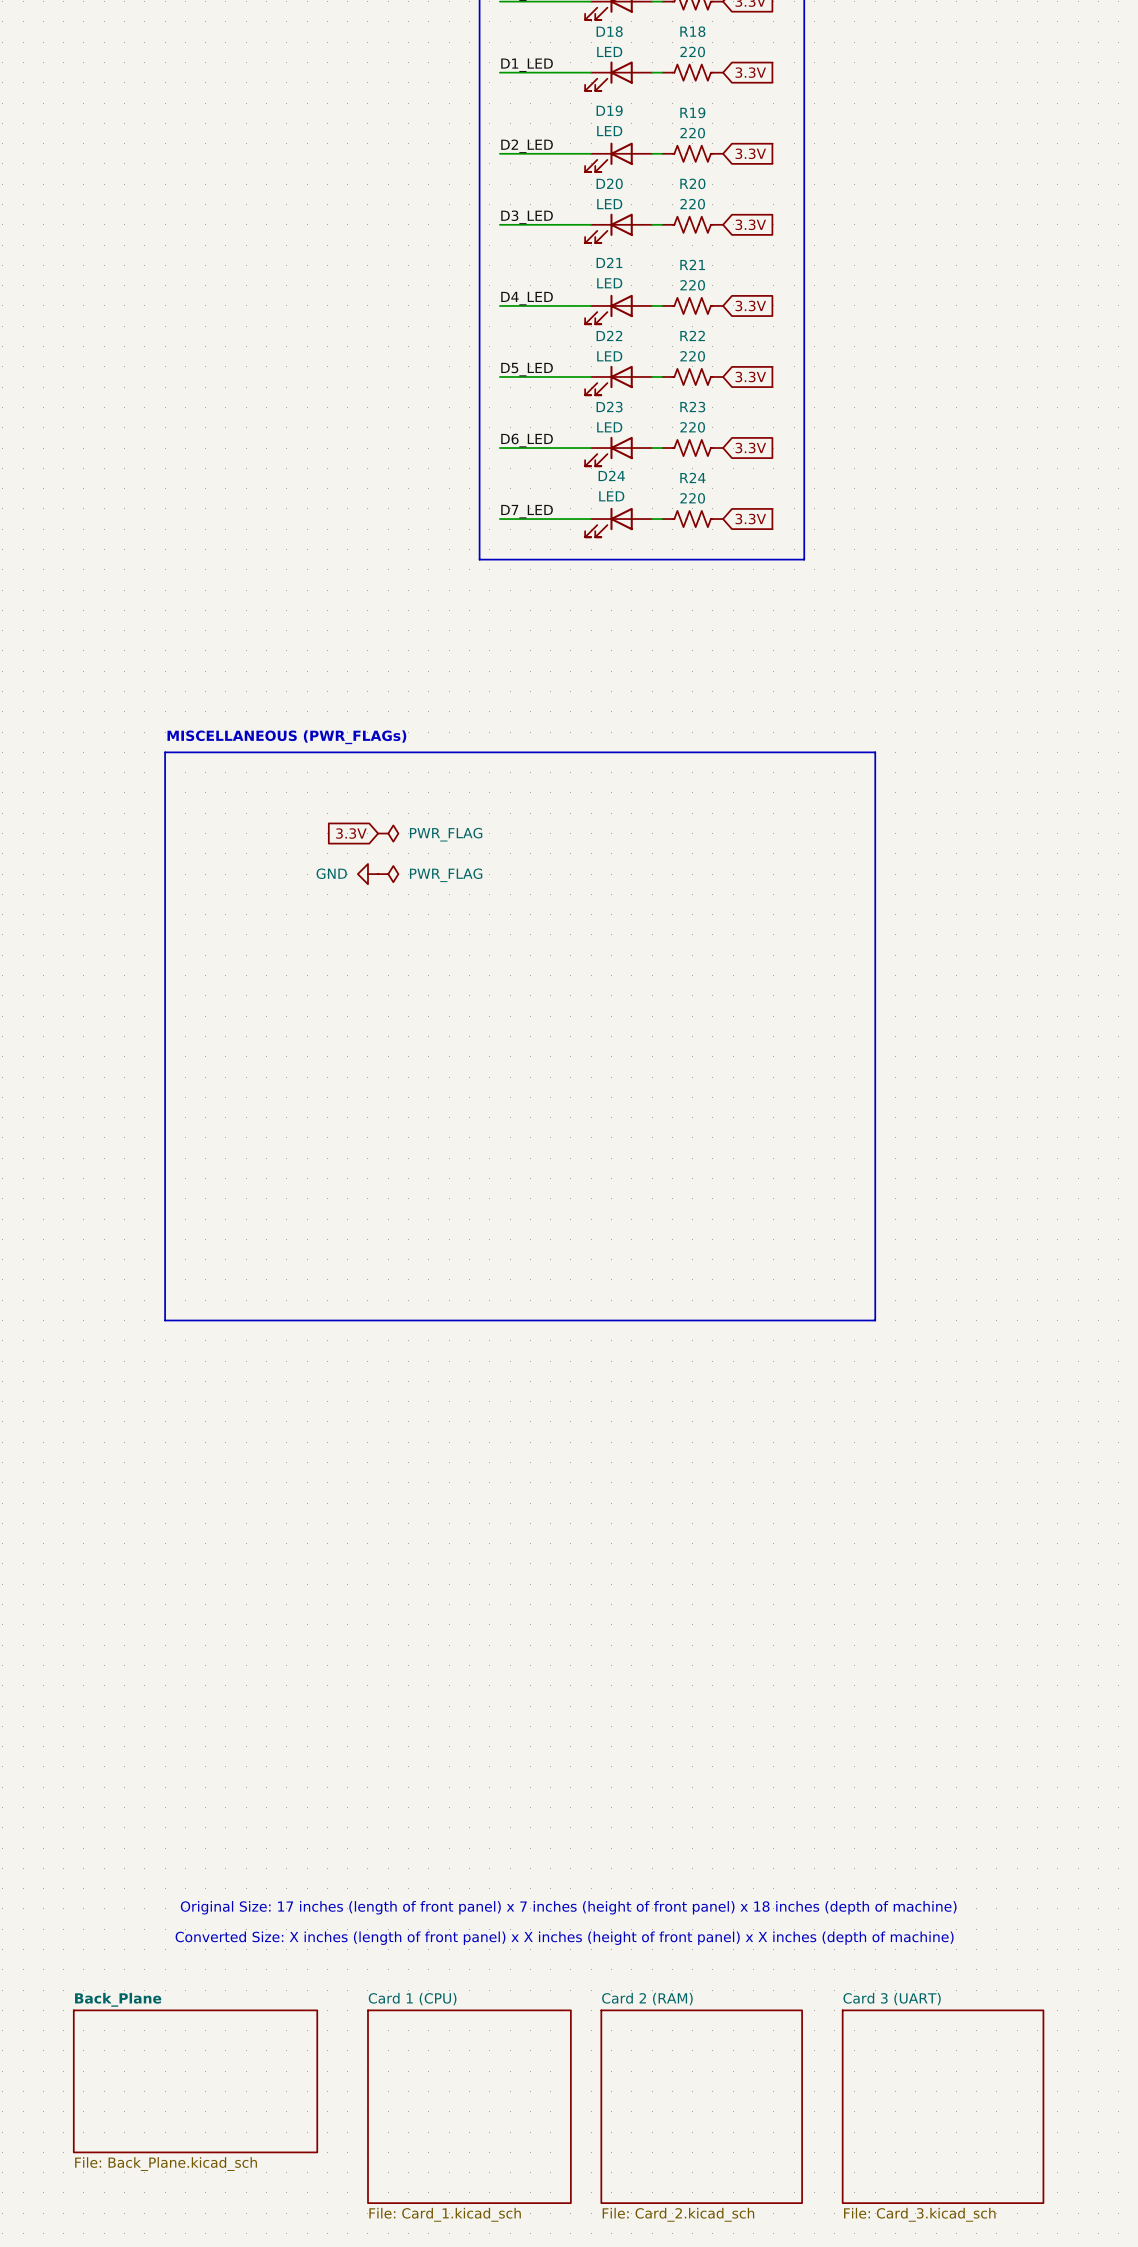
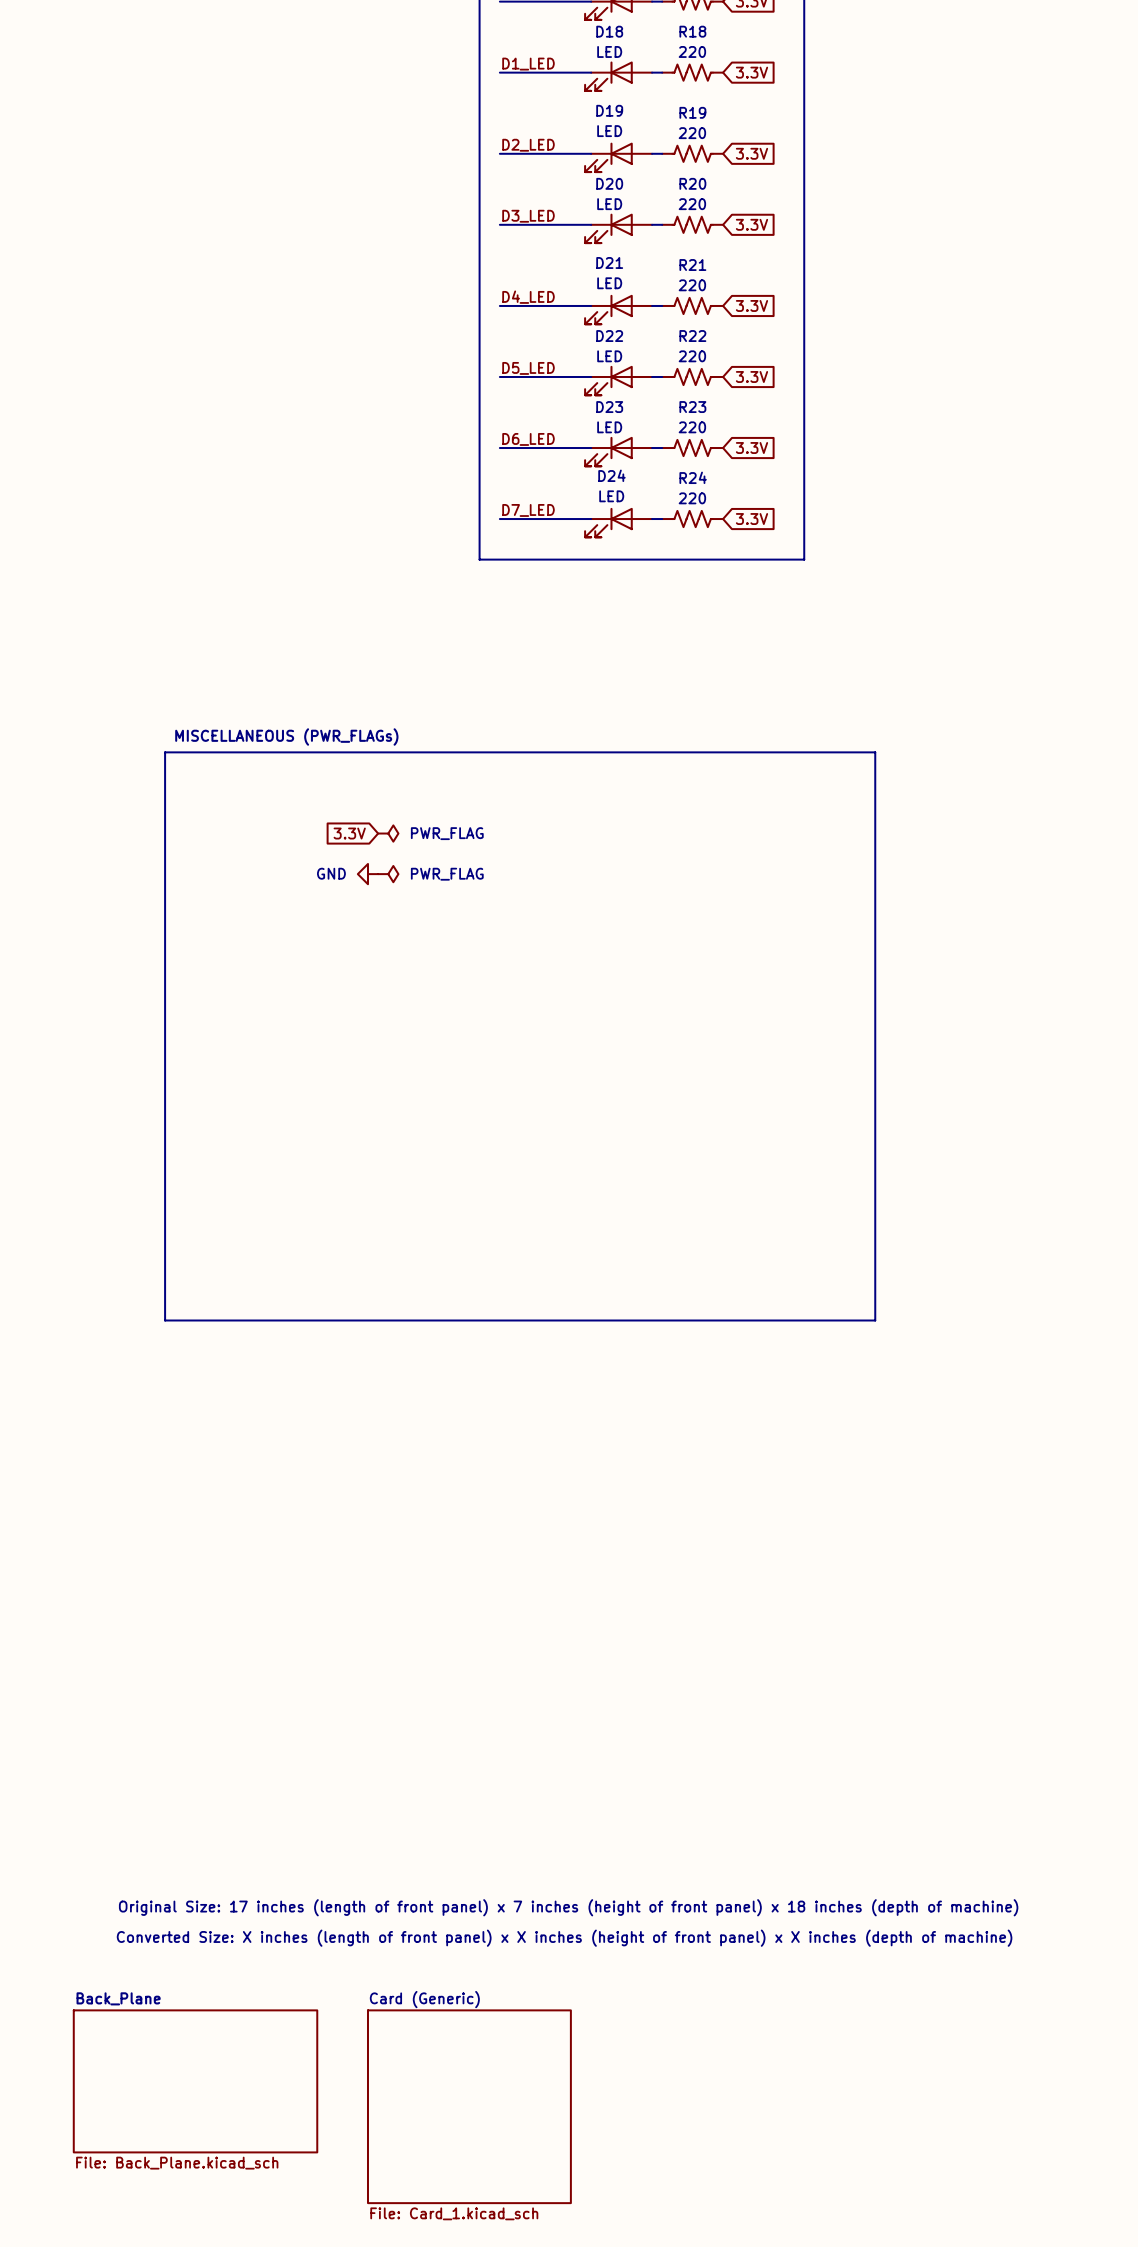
sheet Card 1 (CPU) name: Card 1 (CPU) (412, 1999) -> Card (Generic) (424, 1999)
sheet Card 2 (RAM): File: Card_2.kicad_sch (701, 2106) -> none
sheet Card 3 (UART): File: Card_3.kicad_sch (943, 2106) -> none

